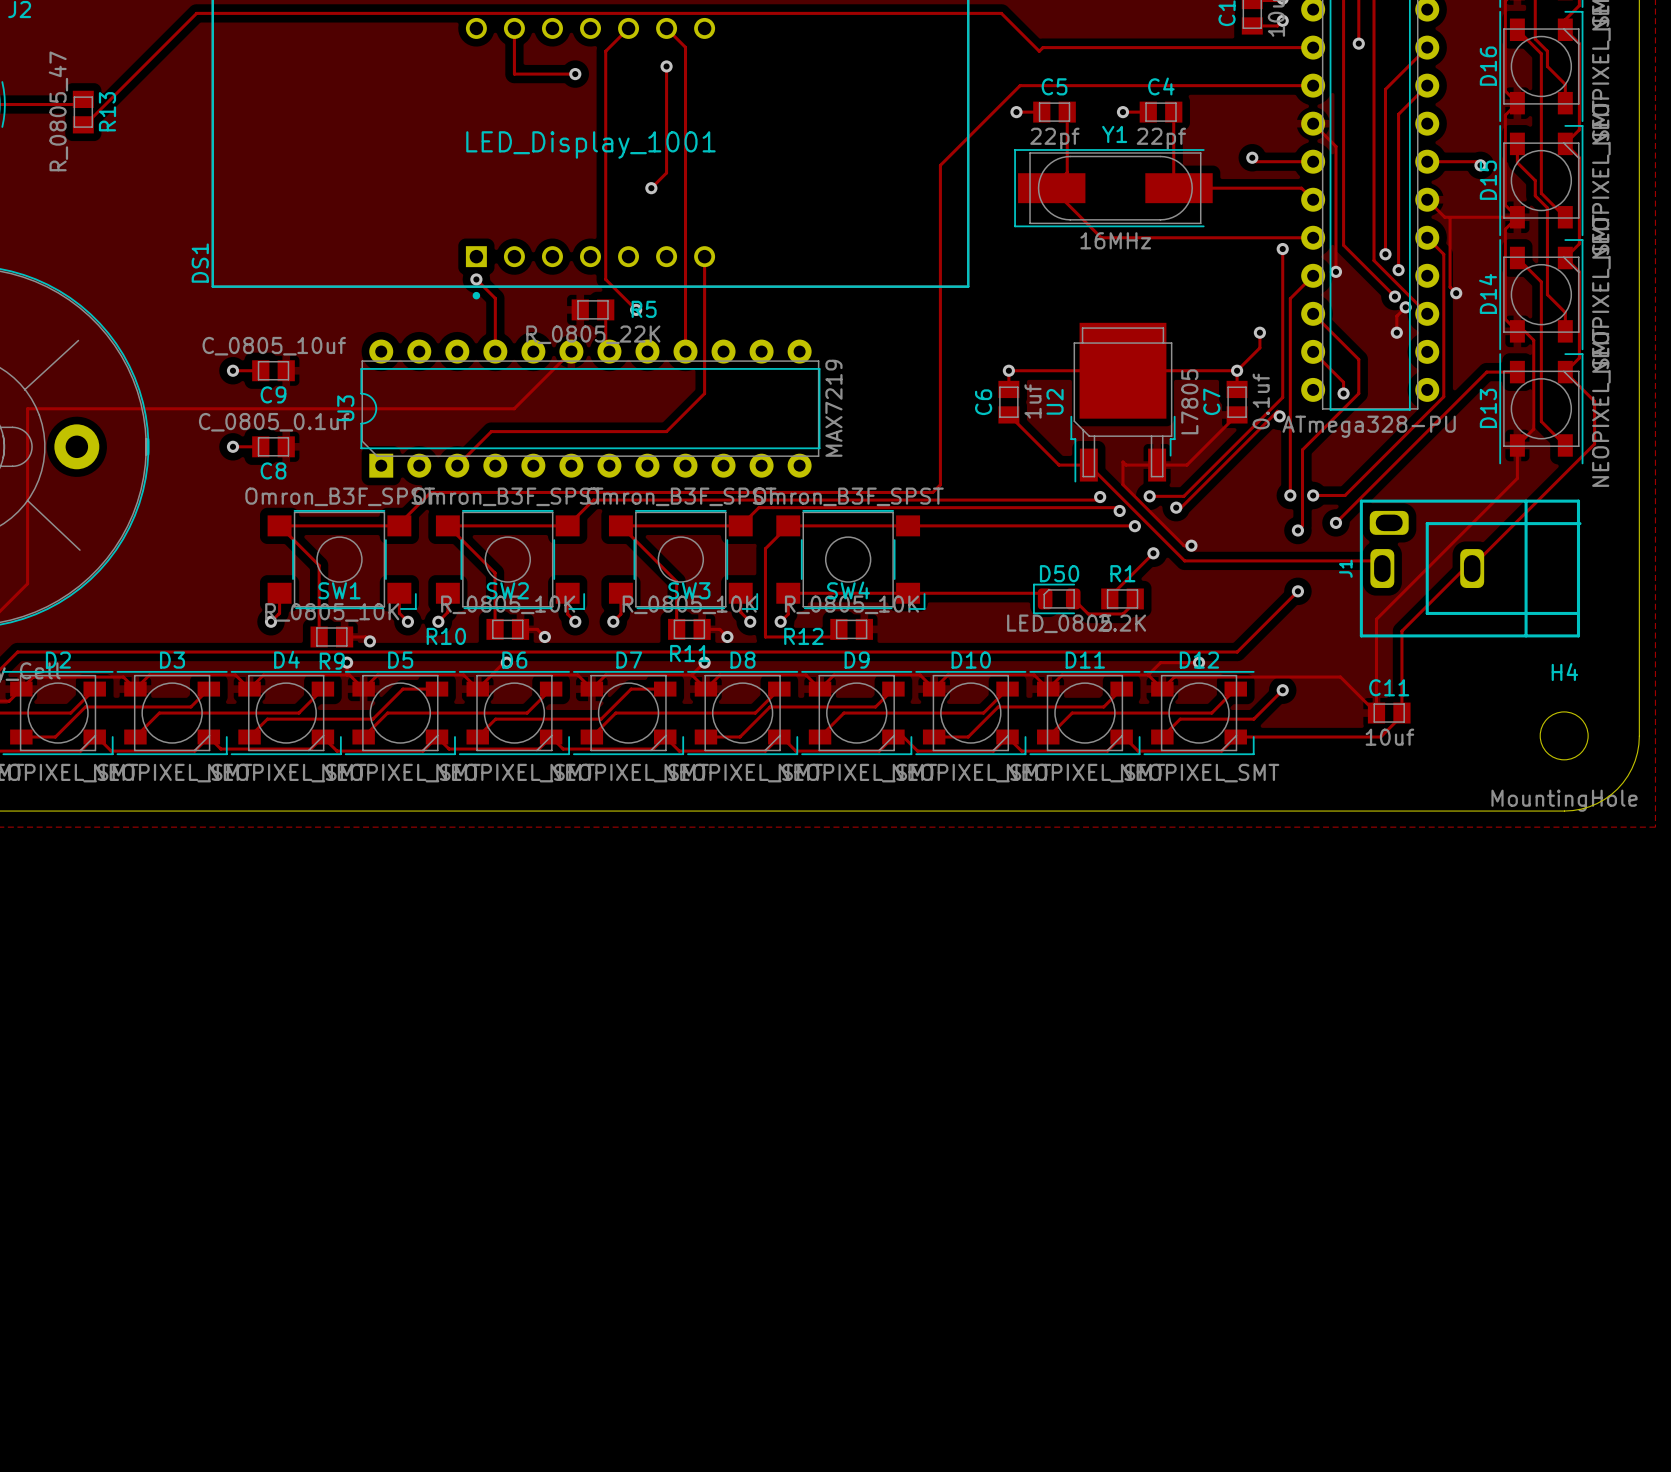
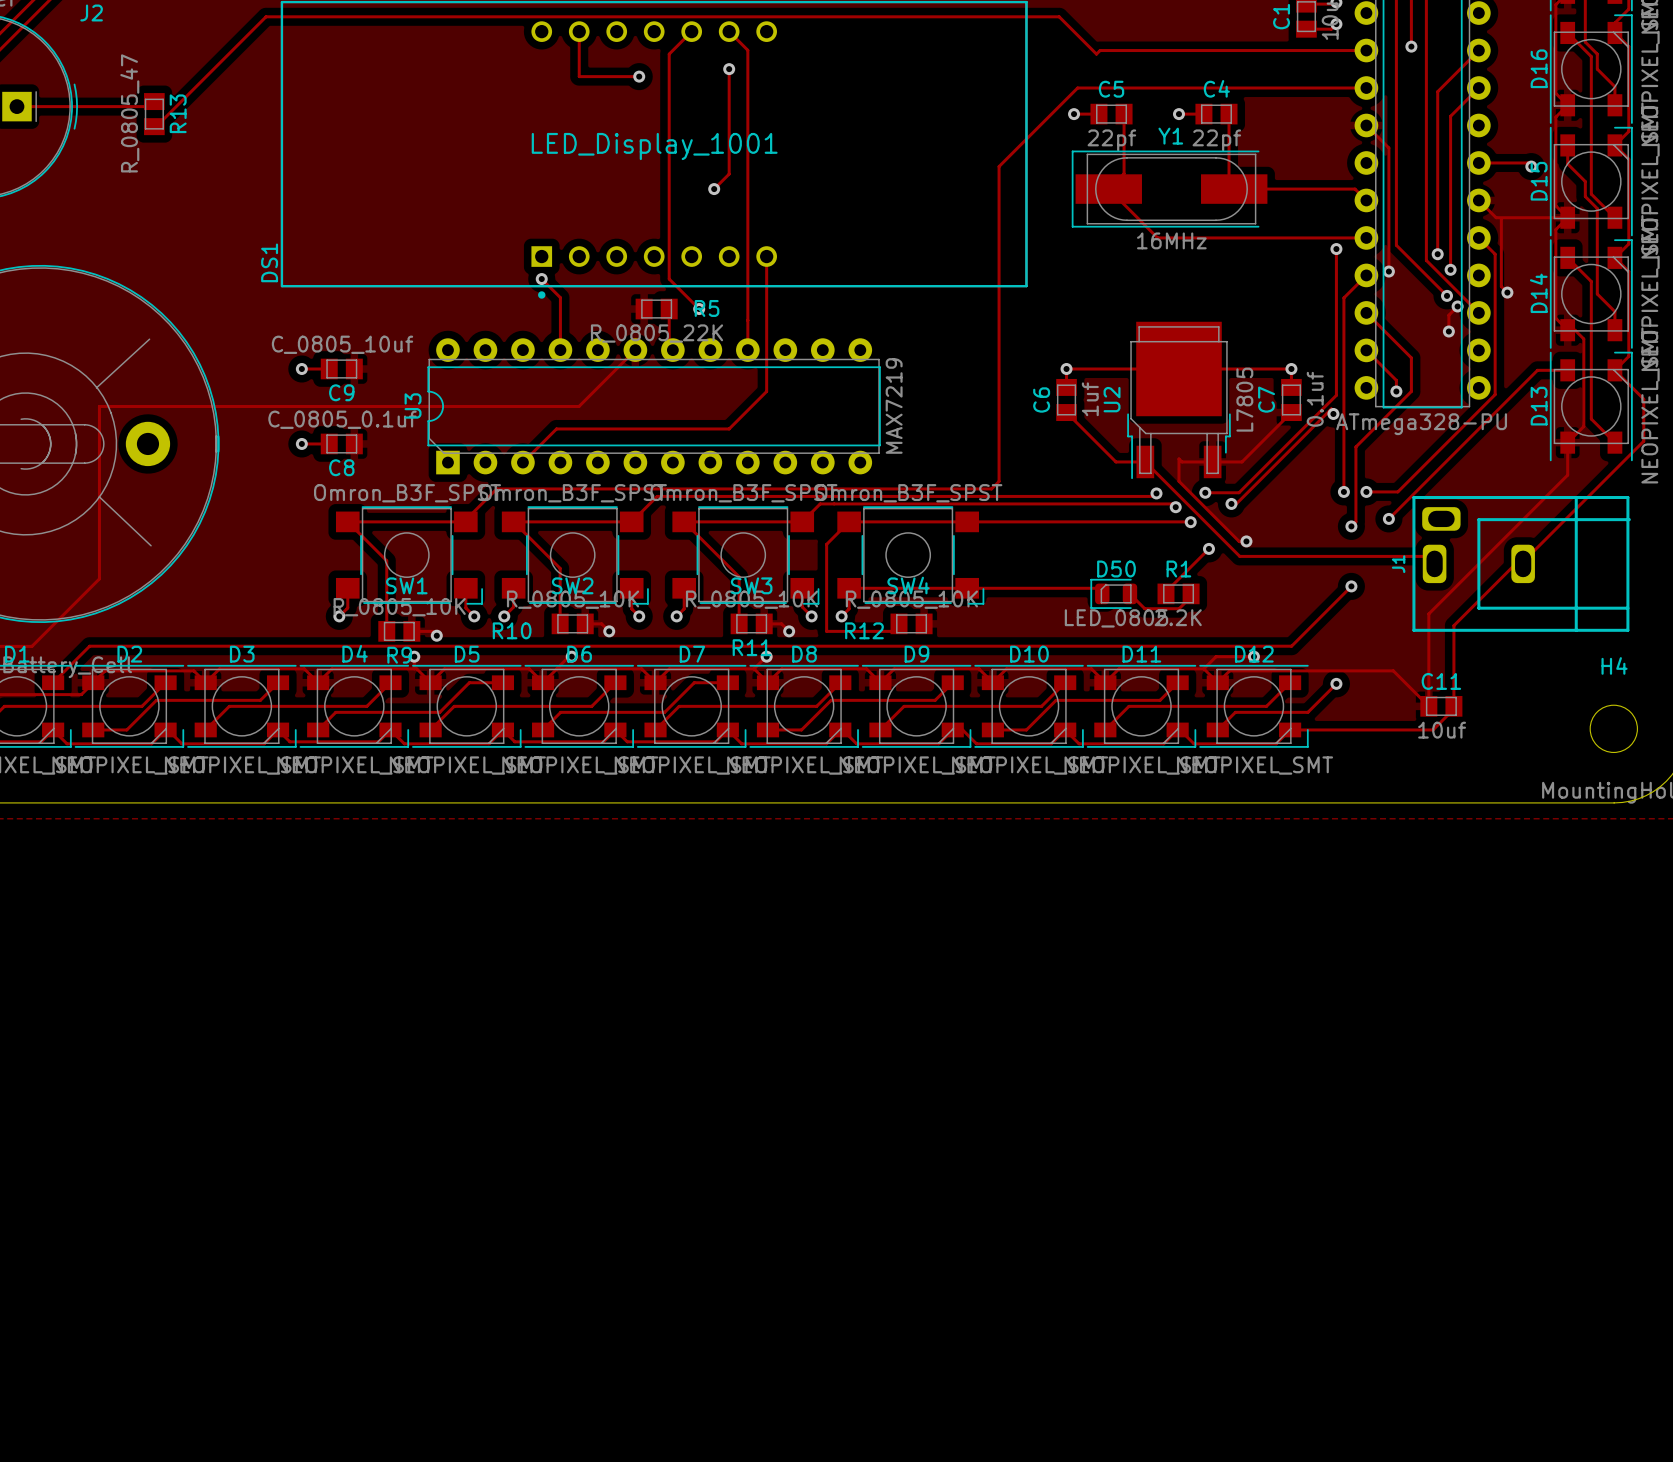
track: (1252, 157) (1256, 161) (1313, 161) -> none
via: (1252, 157) -> none
track: (1259, 332) (1259, 347) (1237, 370) -> none
via: (1259, 332) -> none

